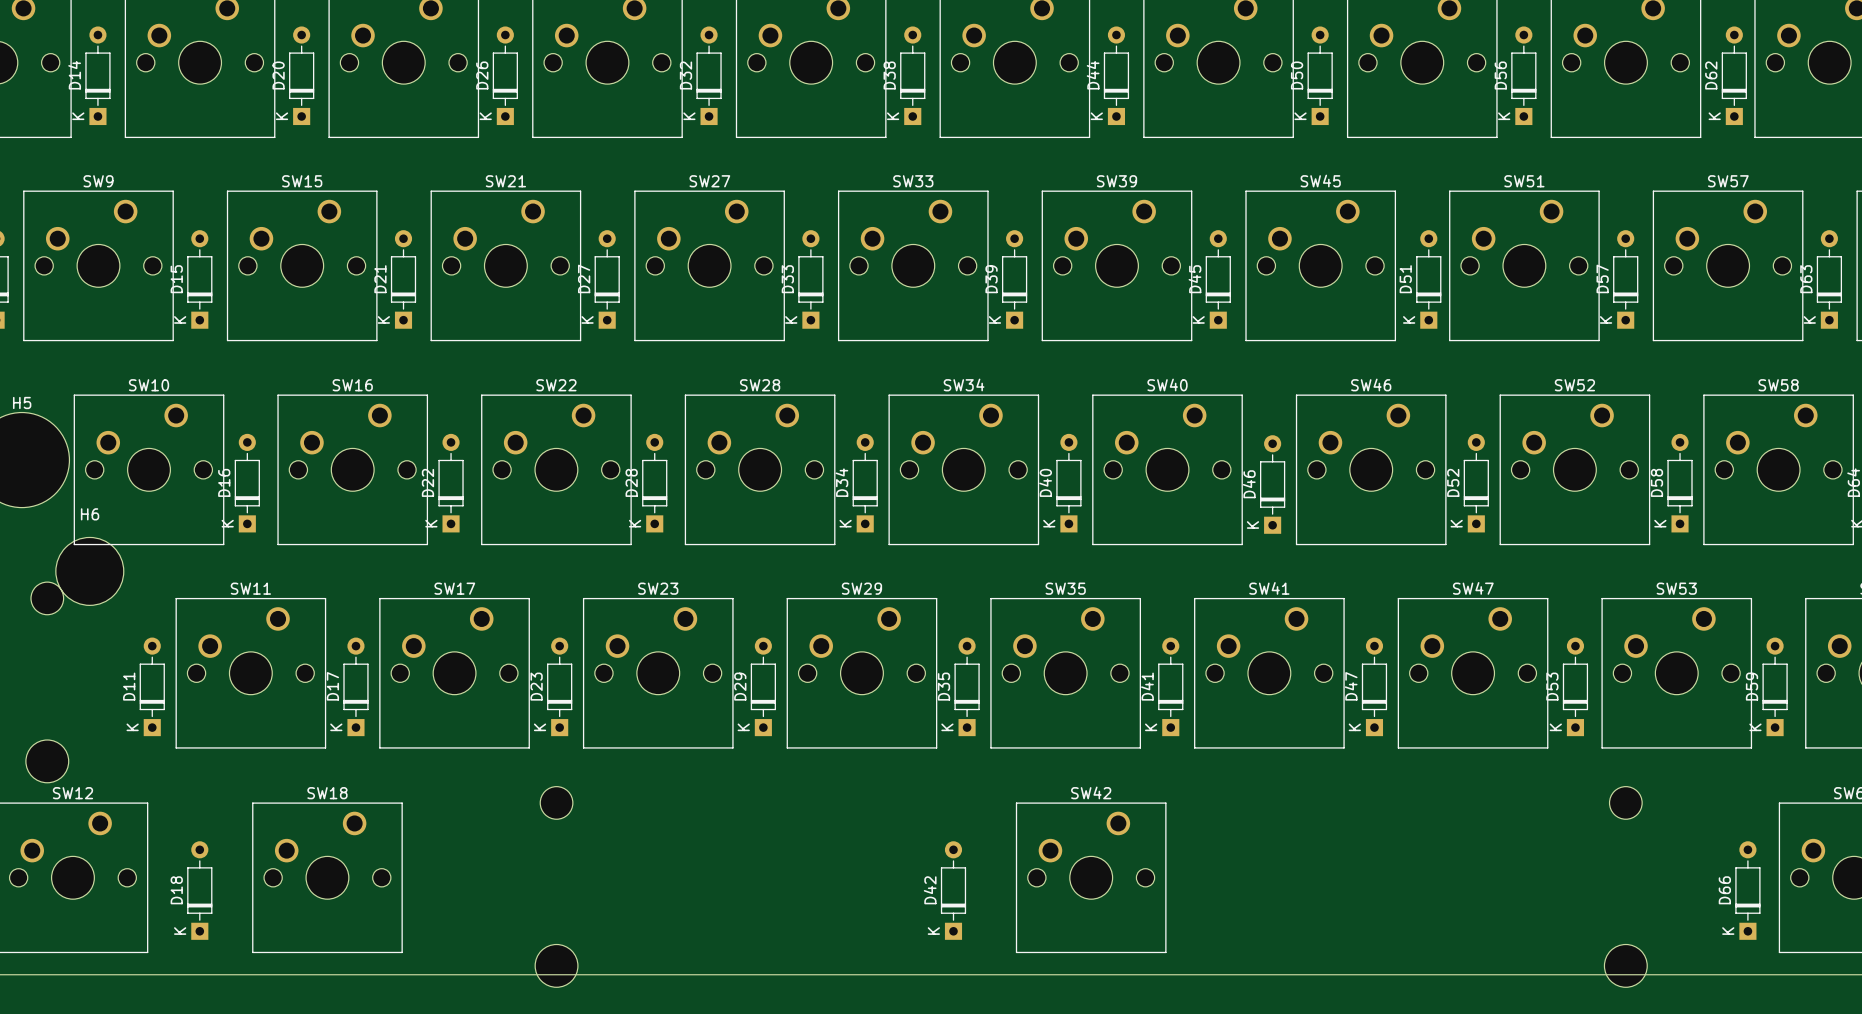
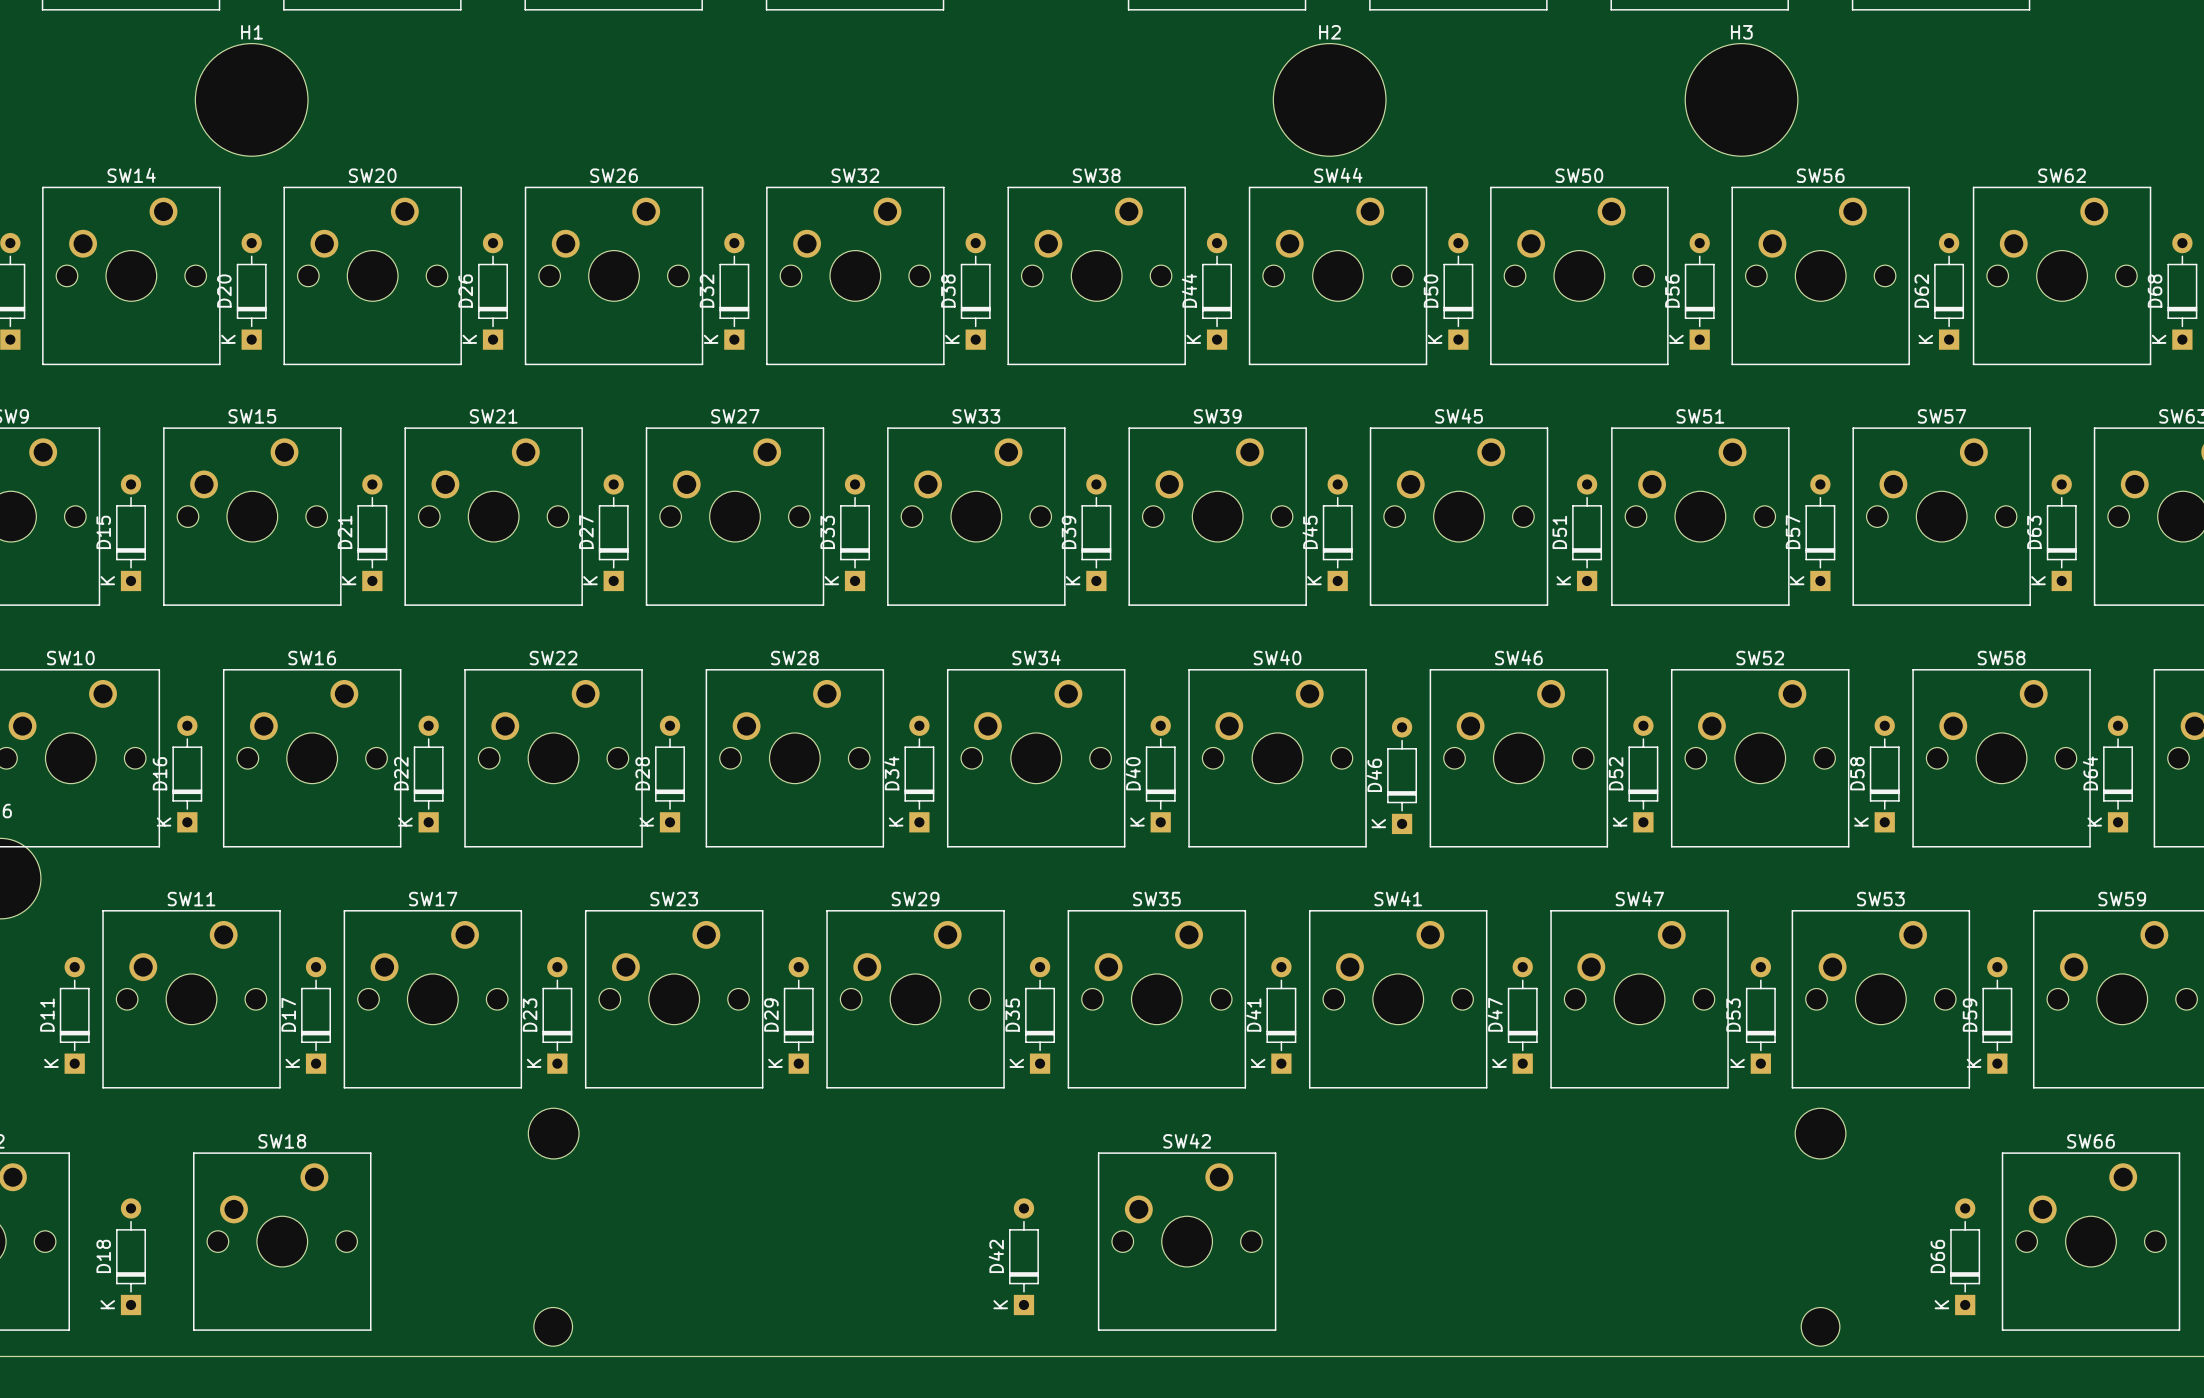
SW42 footprint: [535, 786, 1648, 988] -> [528, 1108, 1846, 1347]

